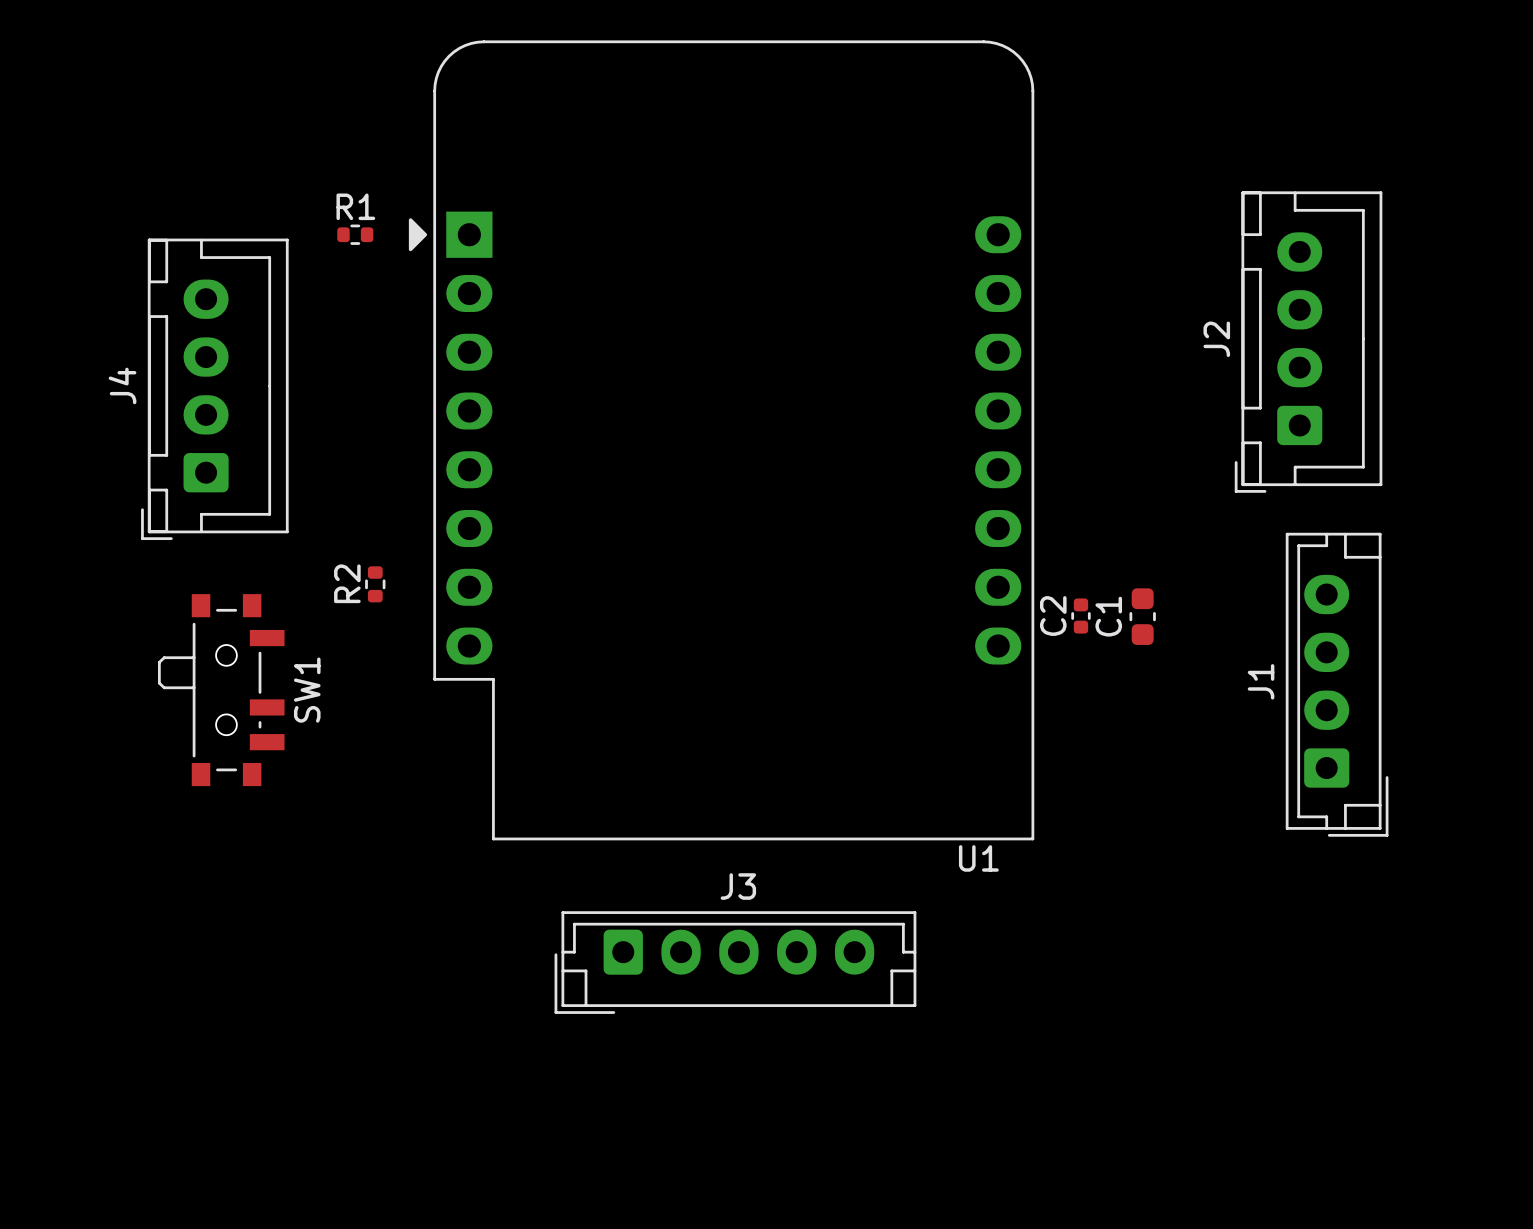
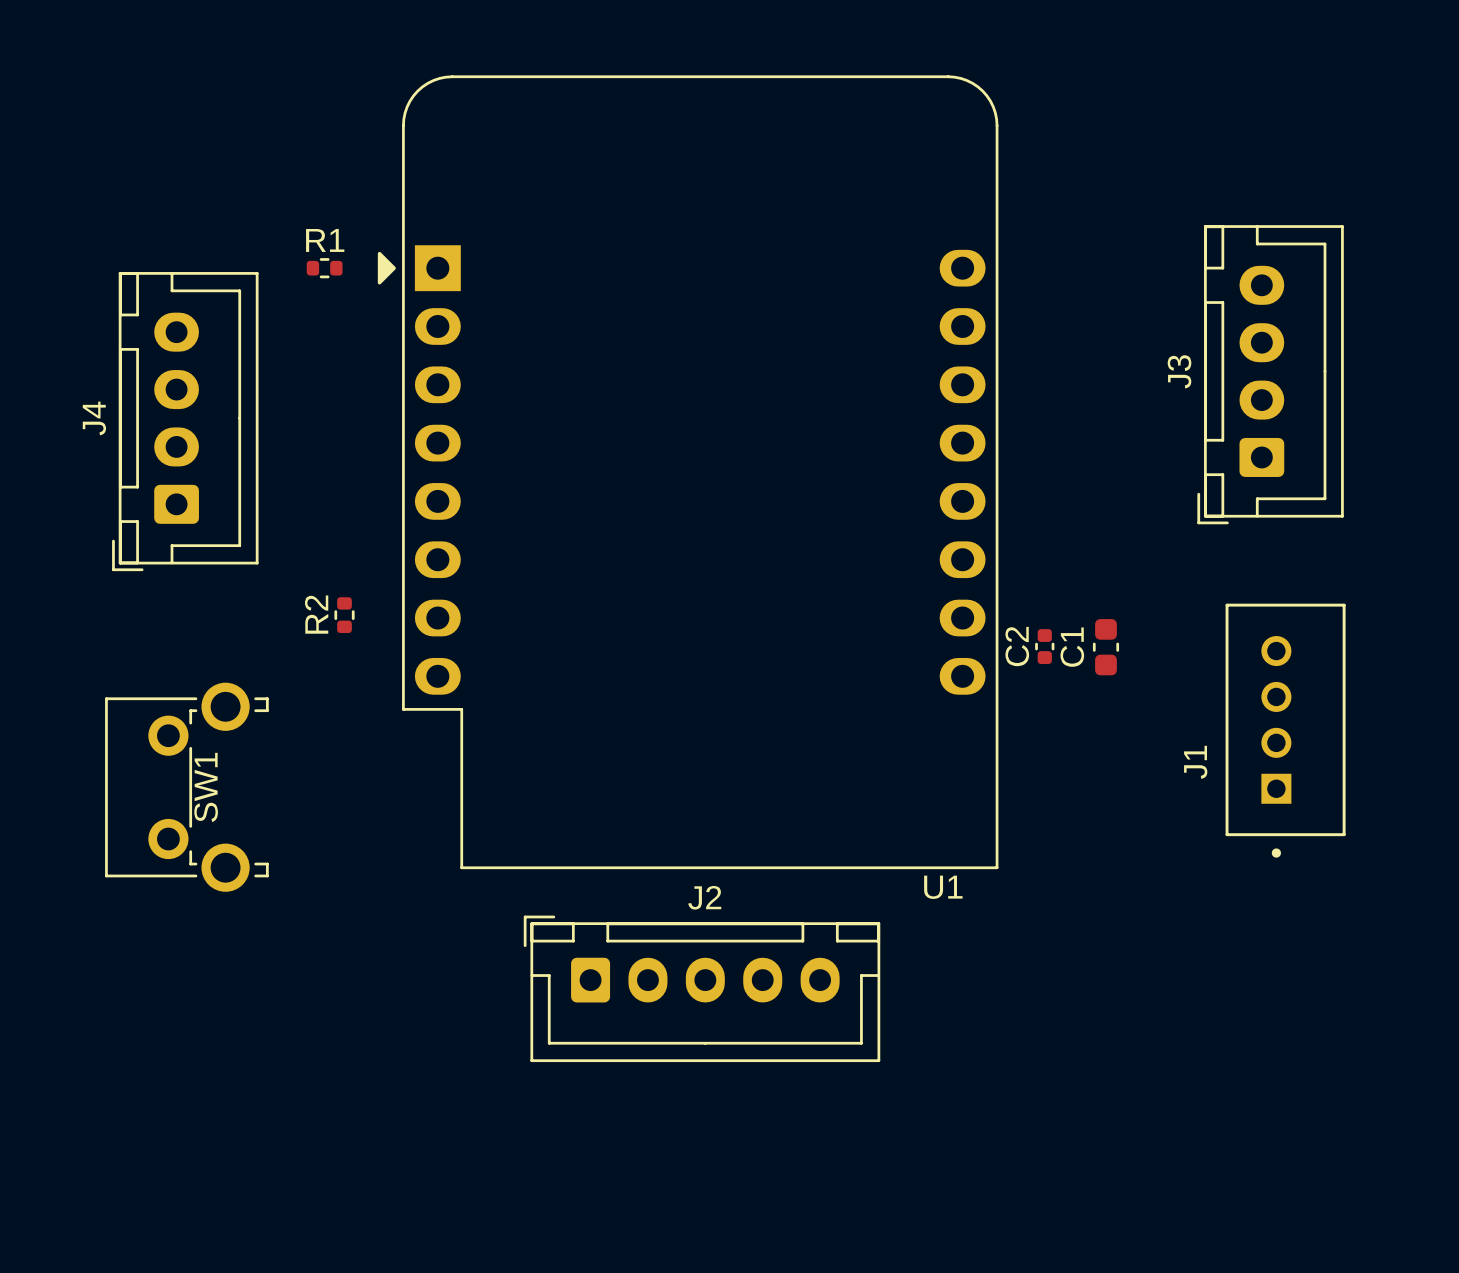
J2 name: J2 (1216, 339) -> J3 (1179, 371)
J1 footprint: [1285, 532, 1389, 837] -> [1225, 603, 1346, 858]
SW1 footprint: [157, 594, 285, 787] -> [105, 682, 269, 892]
SW1 name position: SW1 (307, 690) -> SW1 (206, 787)
J2: none -> (702, 988)
J3: (735, 962) -> none

